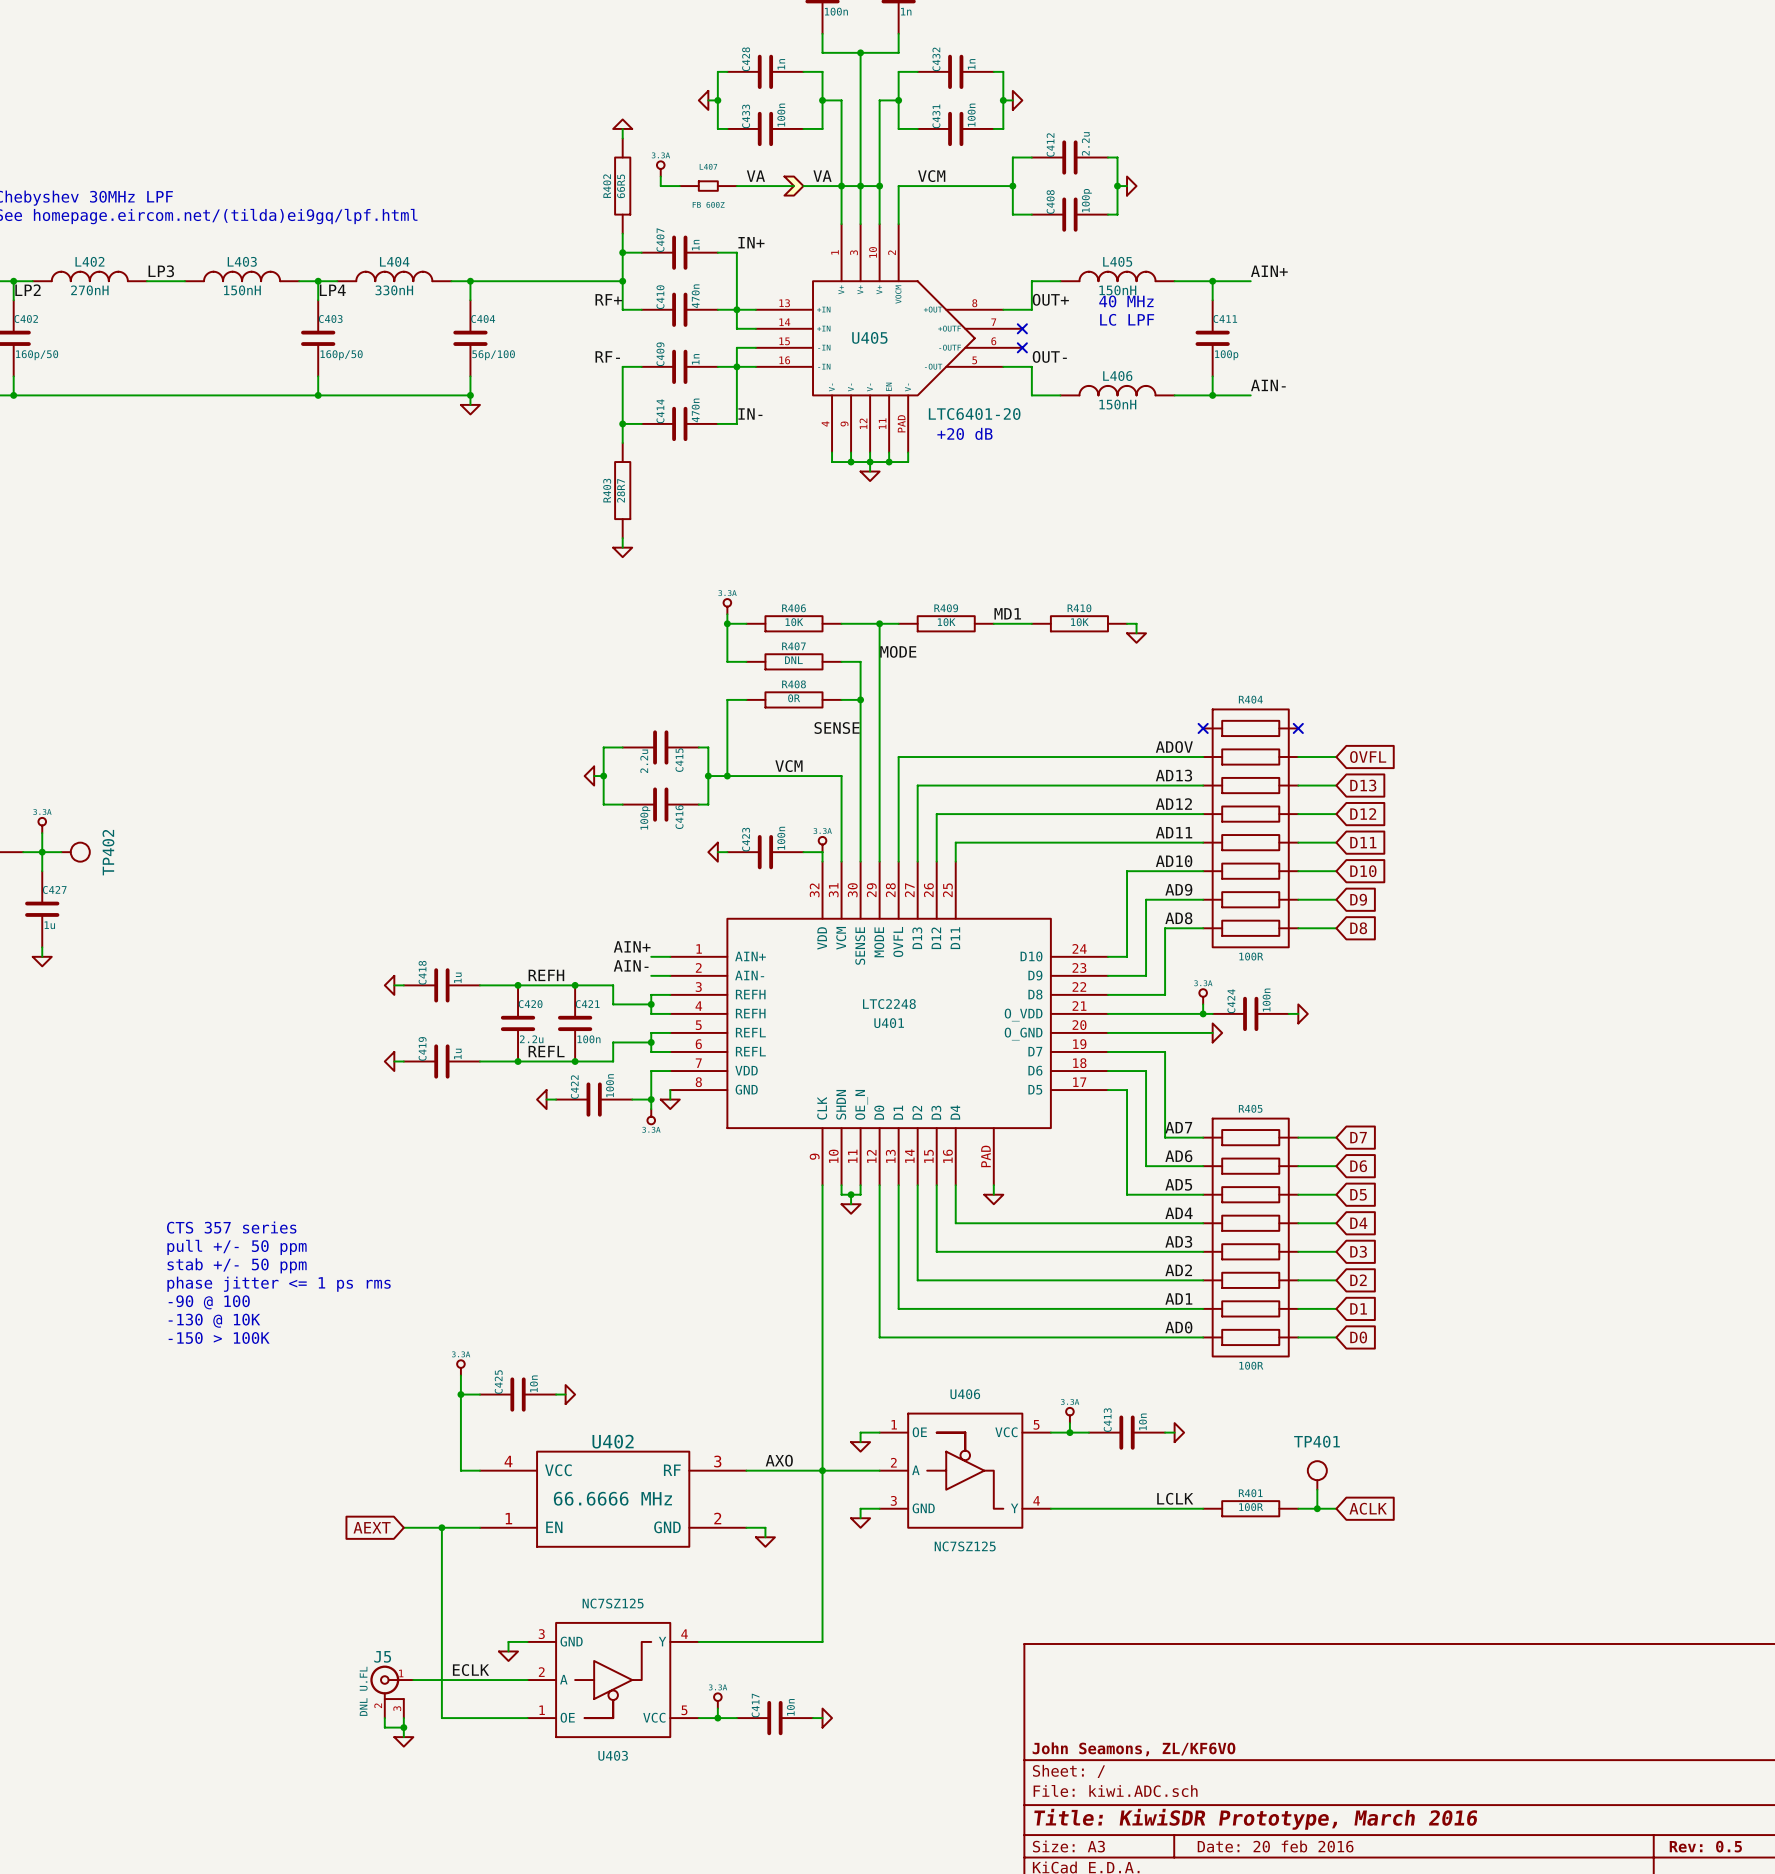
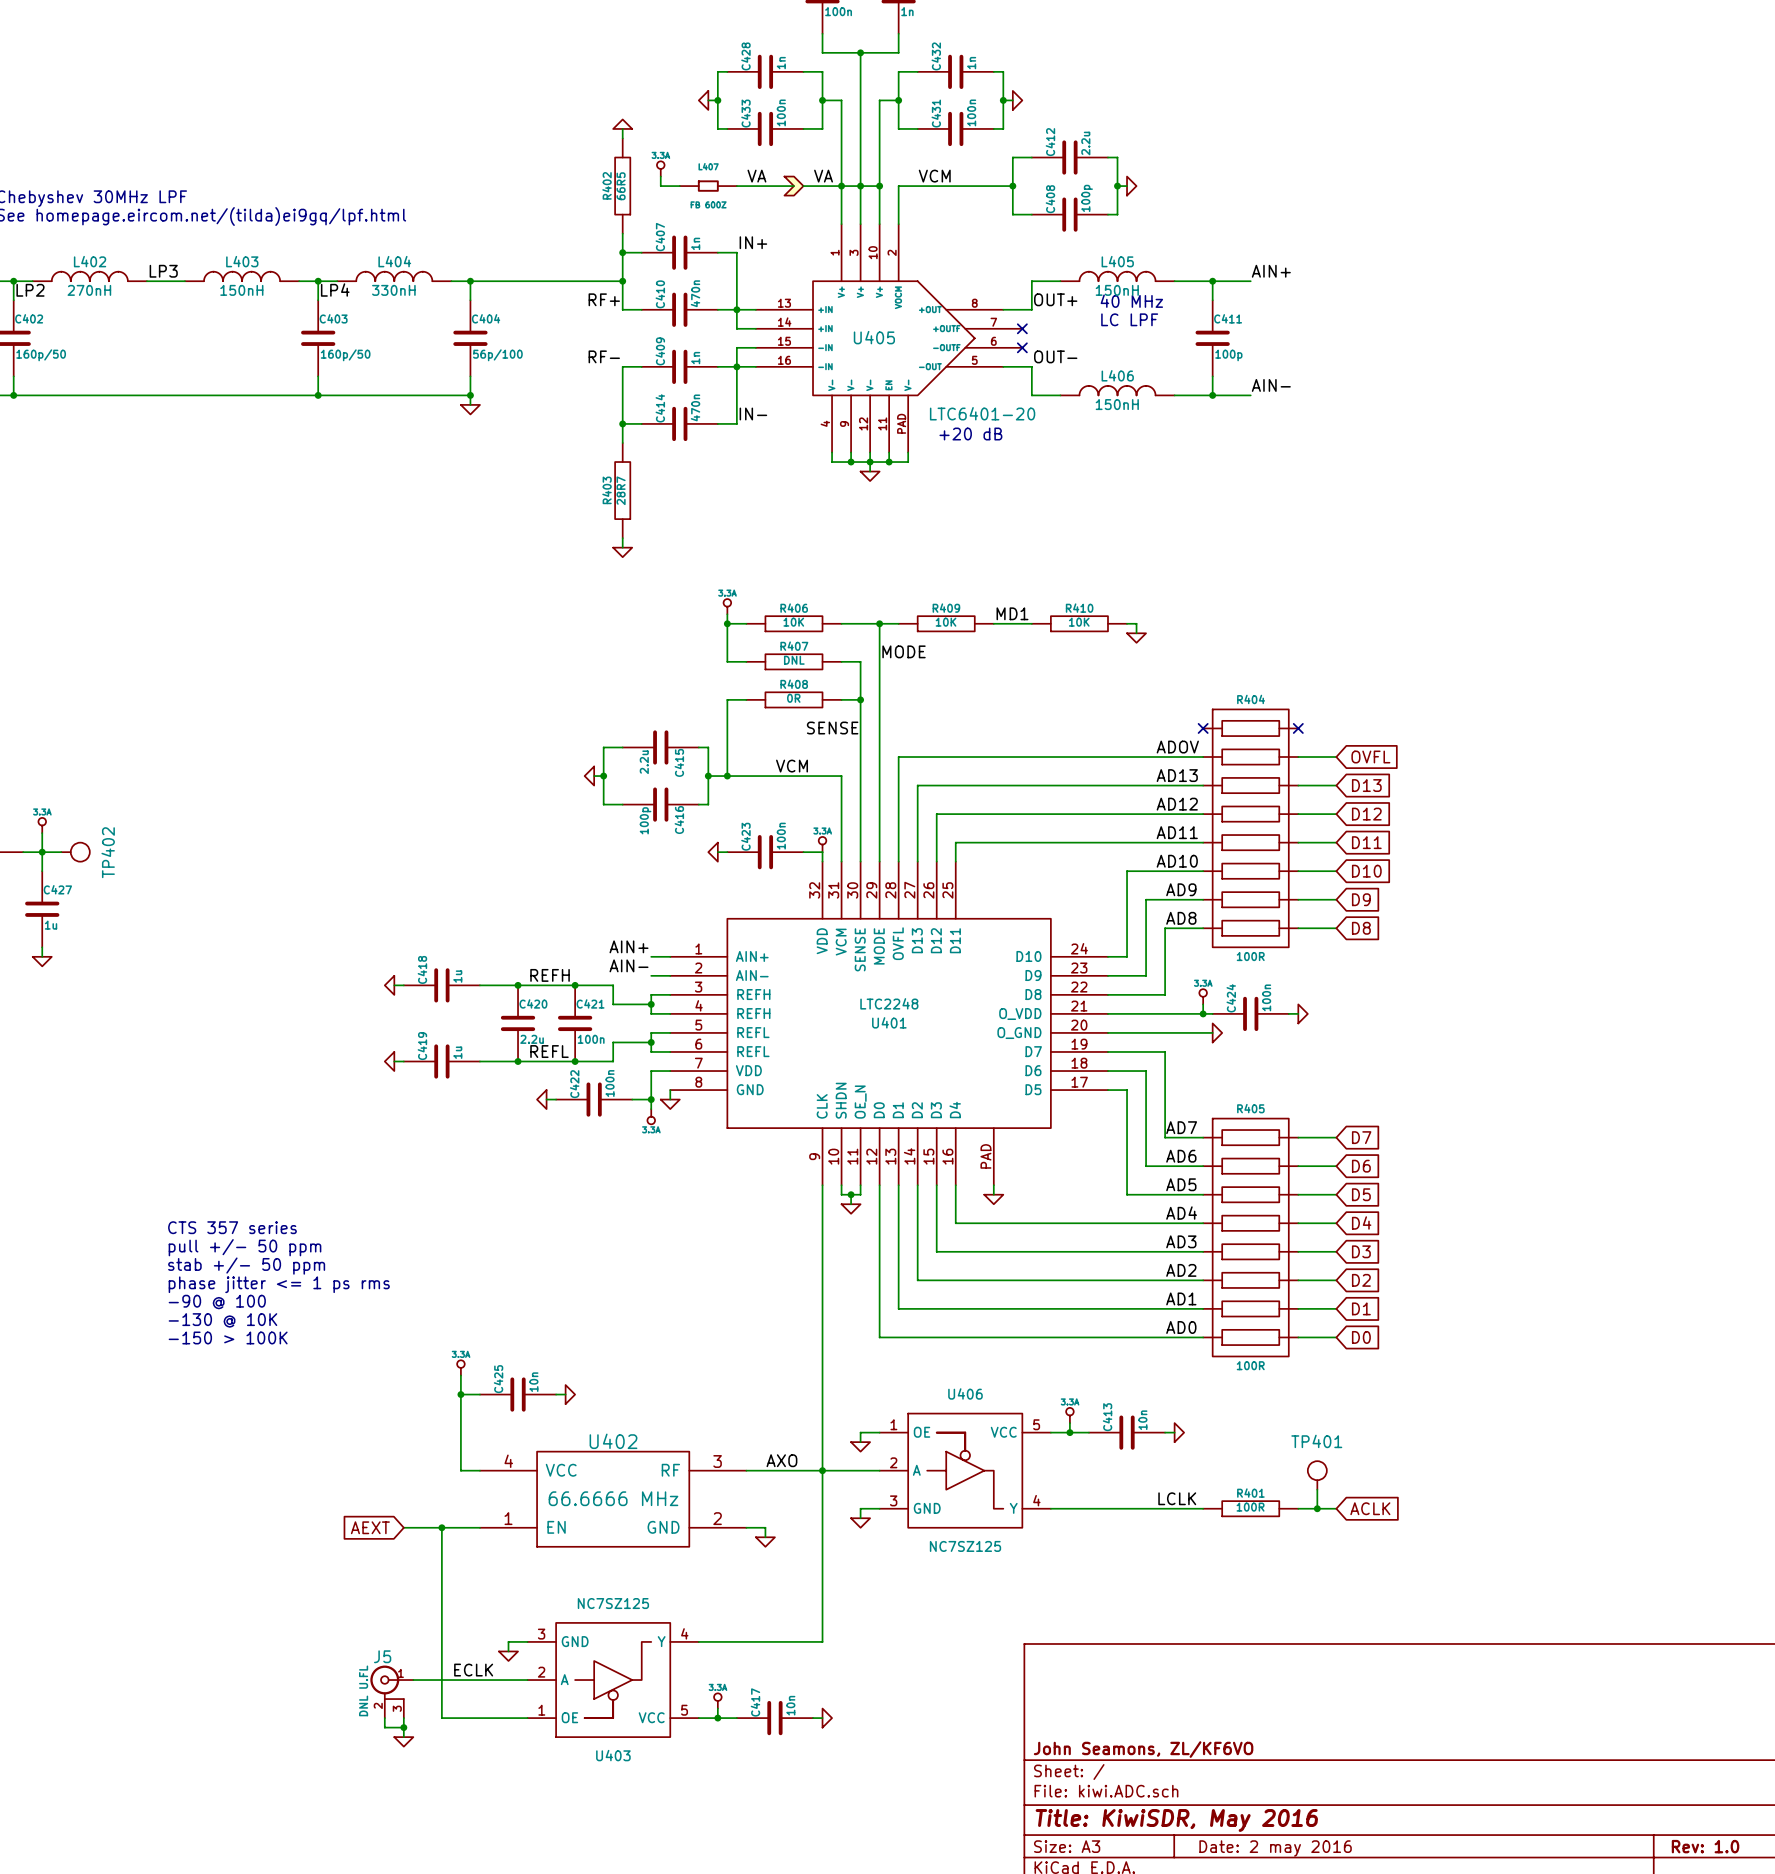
title block: Title: KiwiSDR Prototype, March 2016 (1255, 1819) -> Title: KiwiSDR, May 2016 (1176, 1820)
title block: Date: 20 feb 2016 (1275, 1846) -> Date: 2 may 2016 (1275, 1848)
title block: Rev: 0.5 (1705, 1846) -> Rev: 1.0 (1705, 1846)

